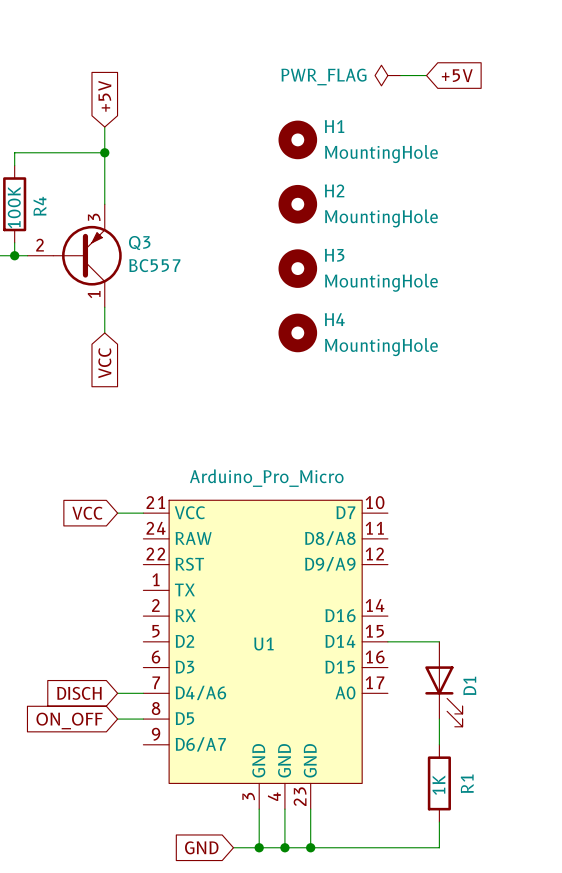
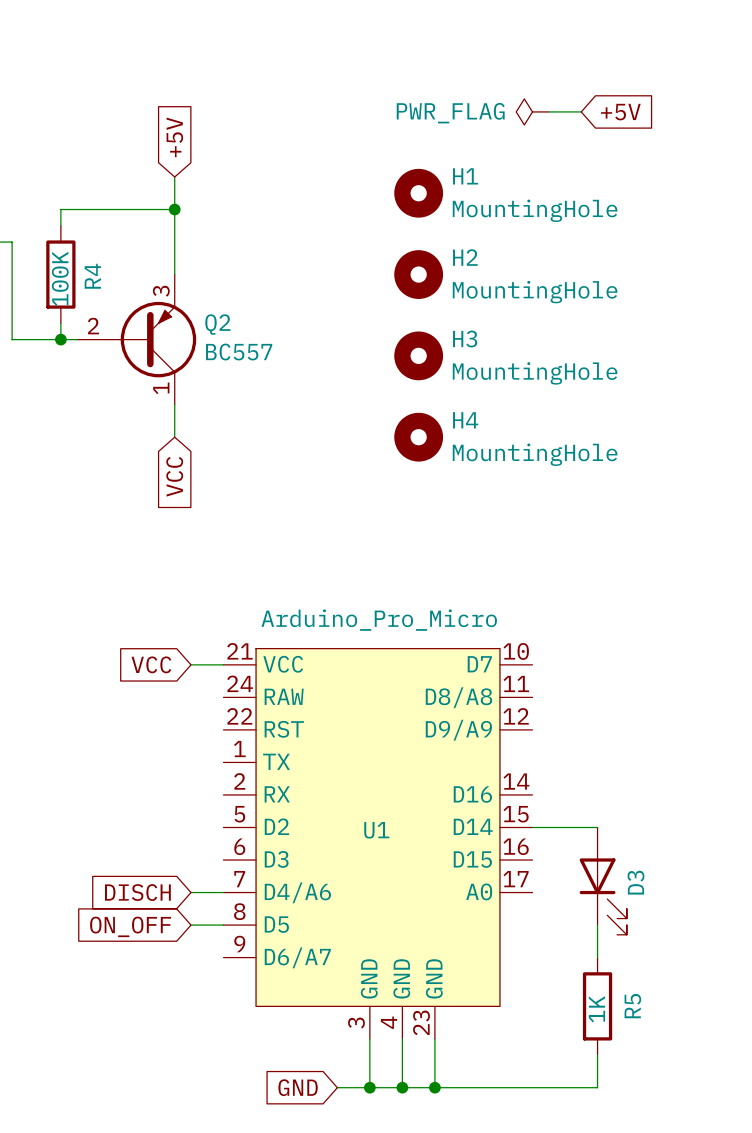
Q3 name: Q3 (139, 243) -> Q2 (217, 324)
D1 name: D1 (469, 685) -> D3 (635, 882)
R1 name: R1 (467, 783) -> R5 (632, 1006)

